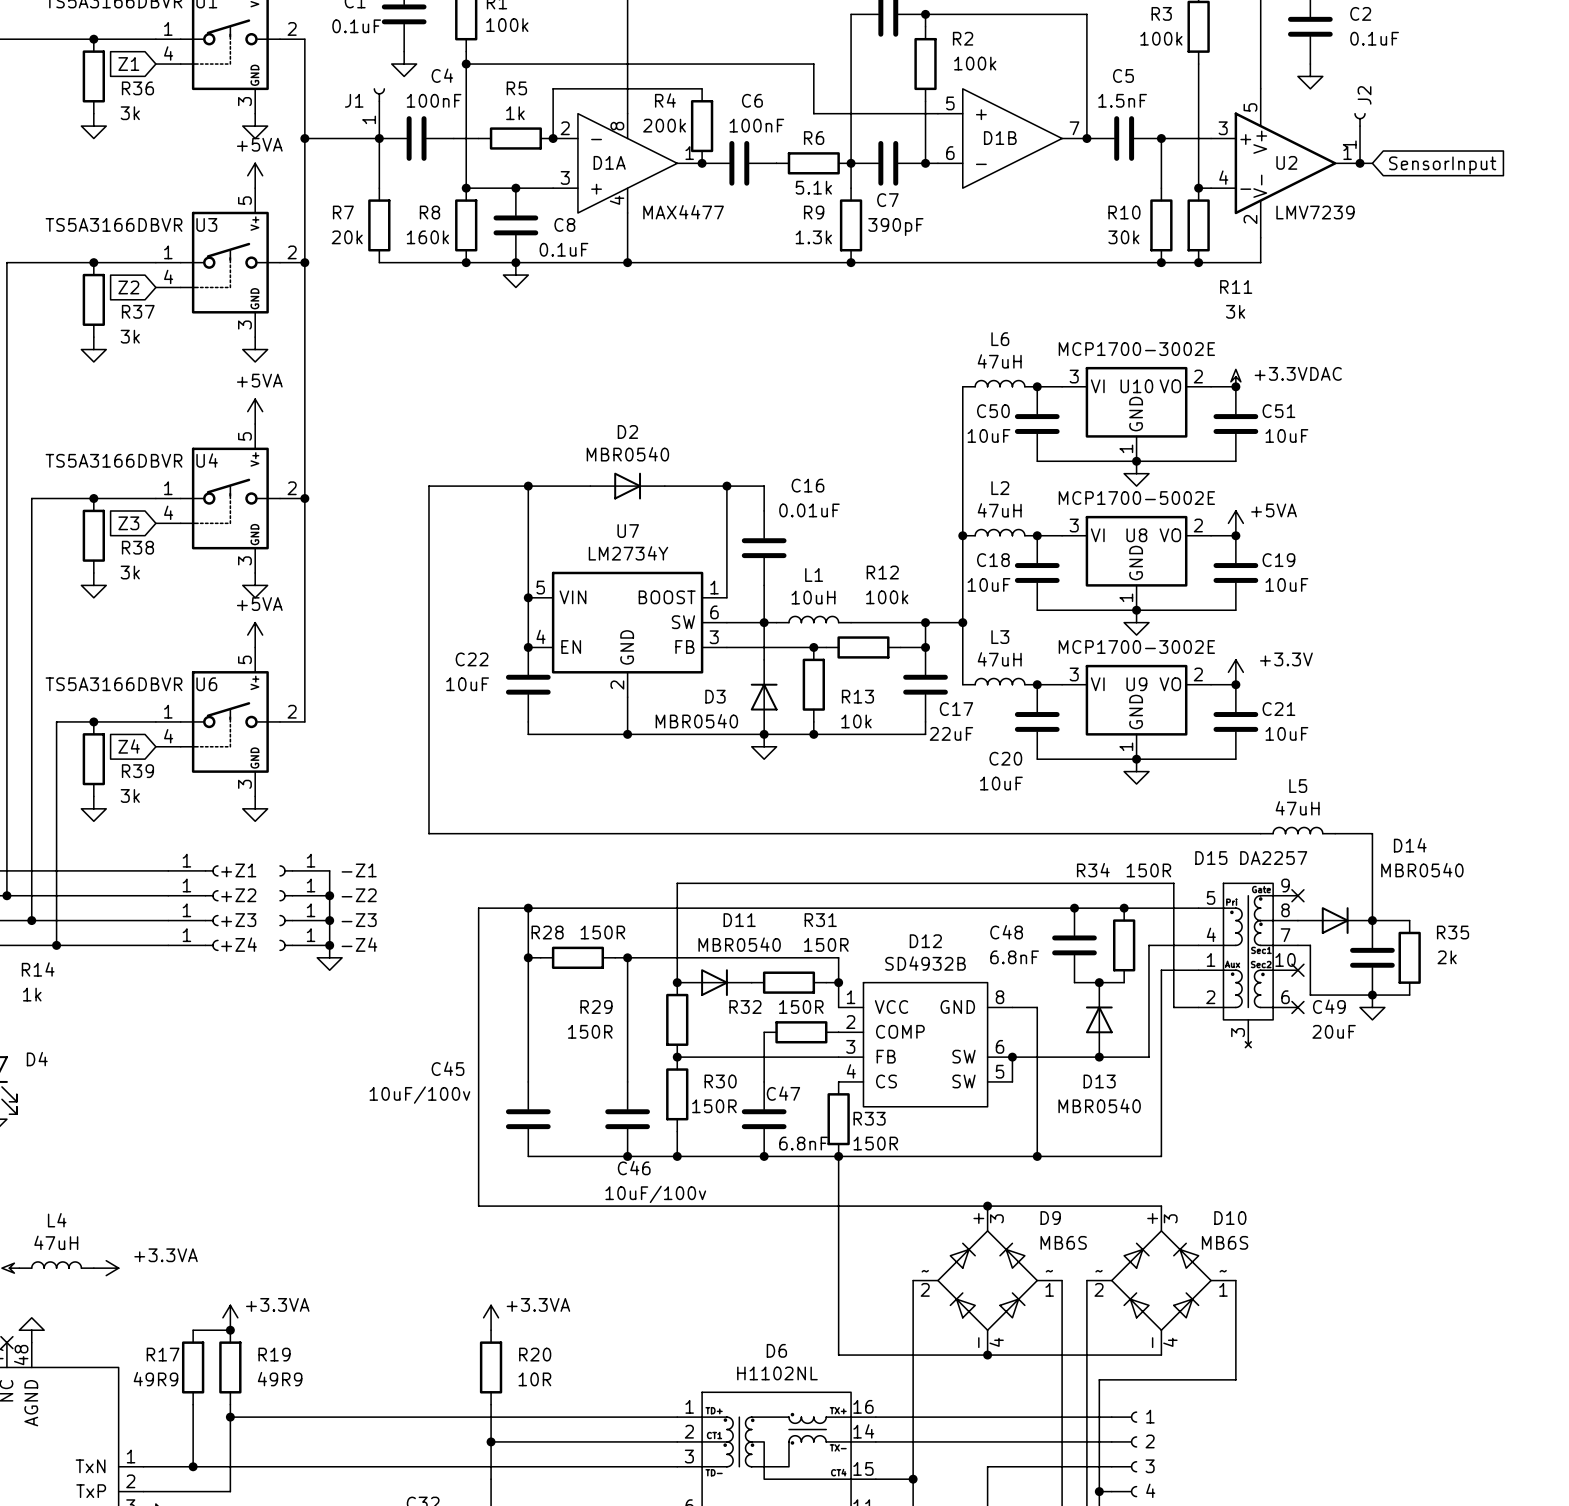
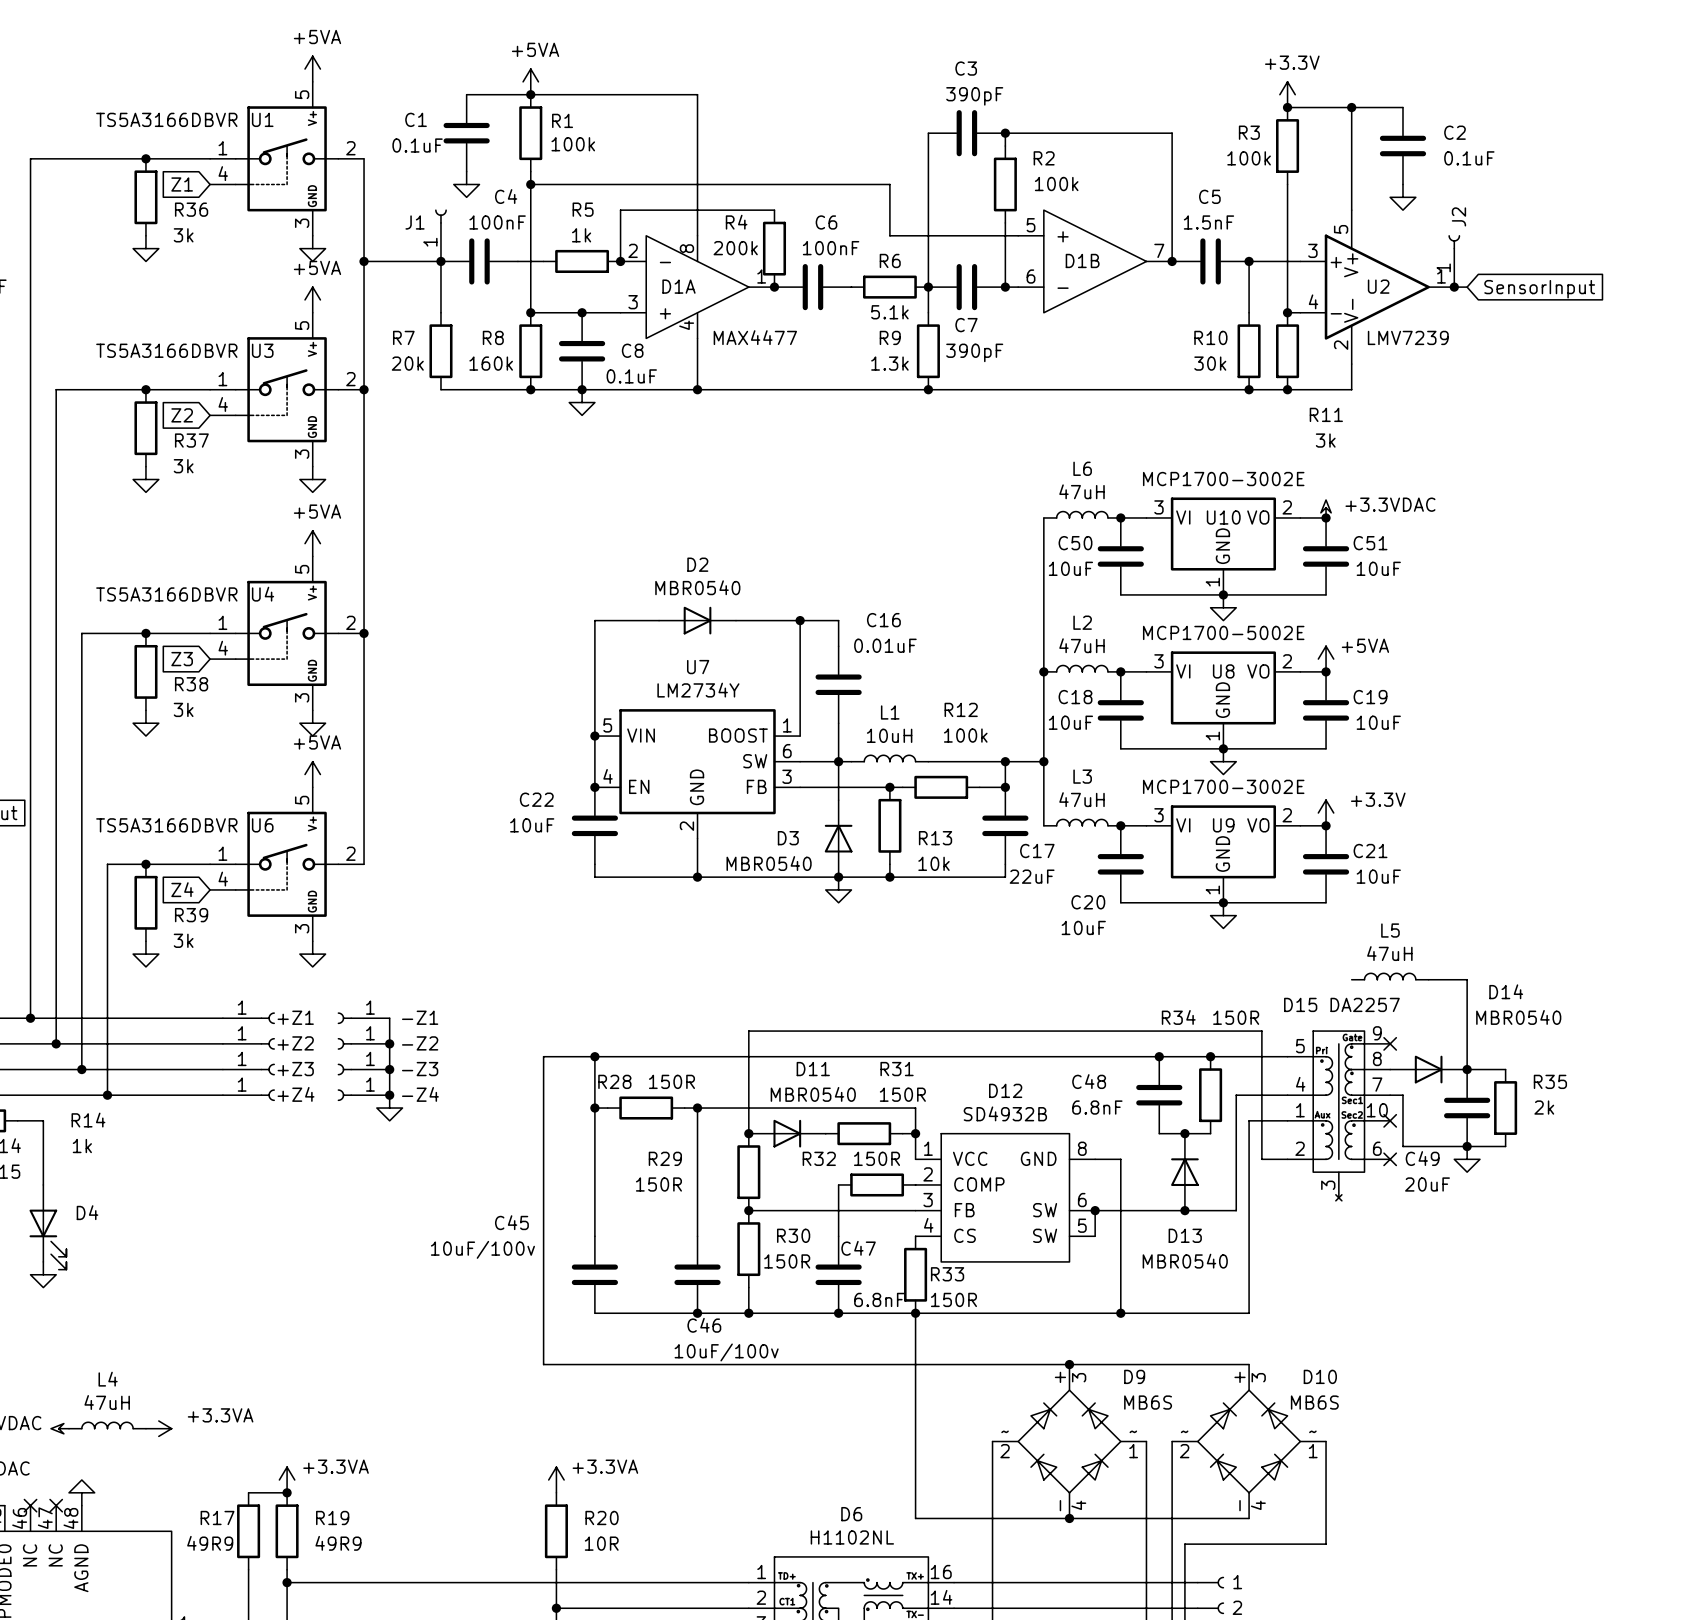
wire: (528, 486) (428, 486) (428, 833) (1260, 833) -> none
junction: (528, 486) -> none

